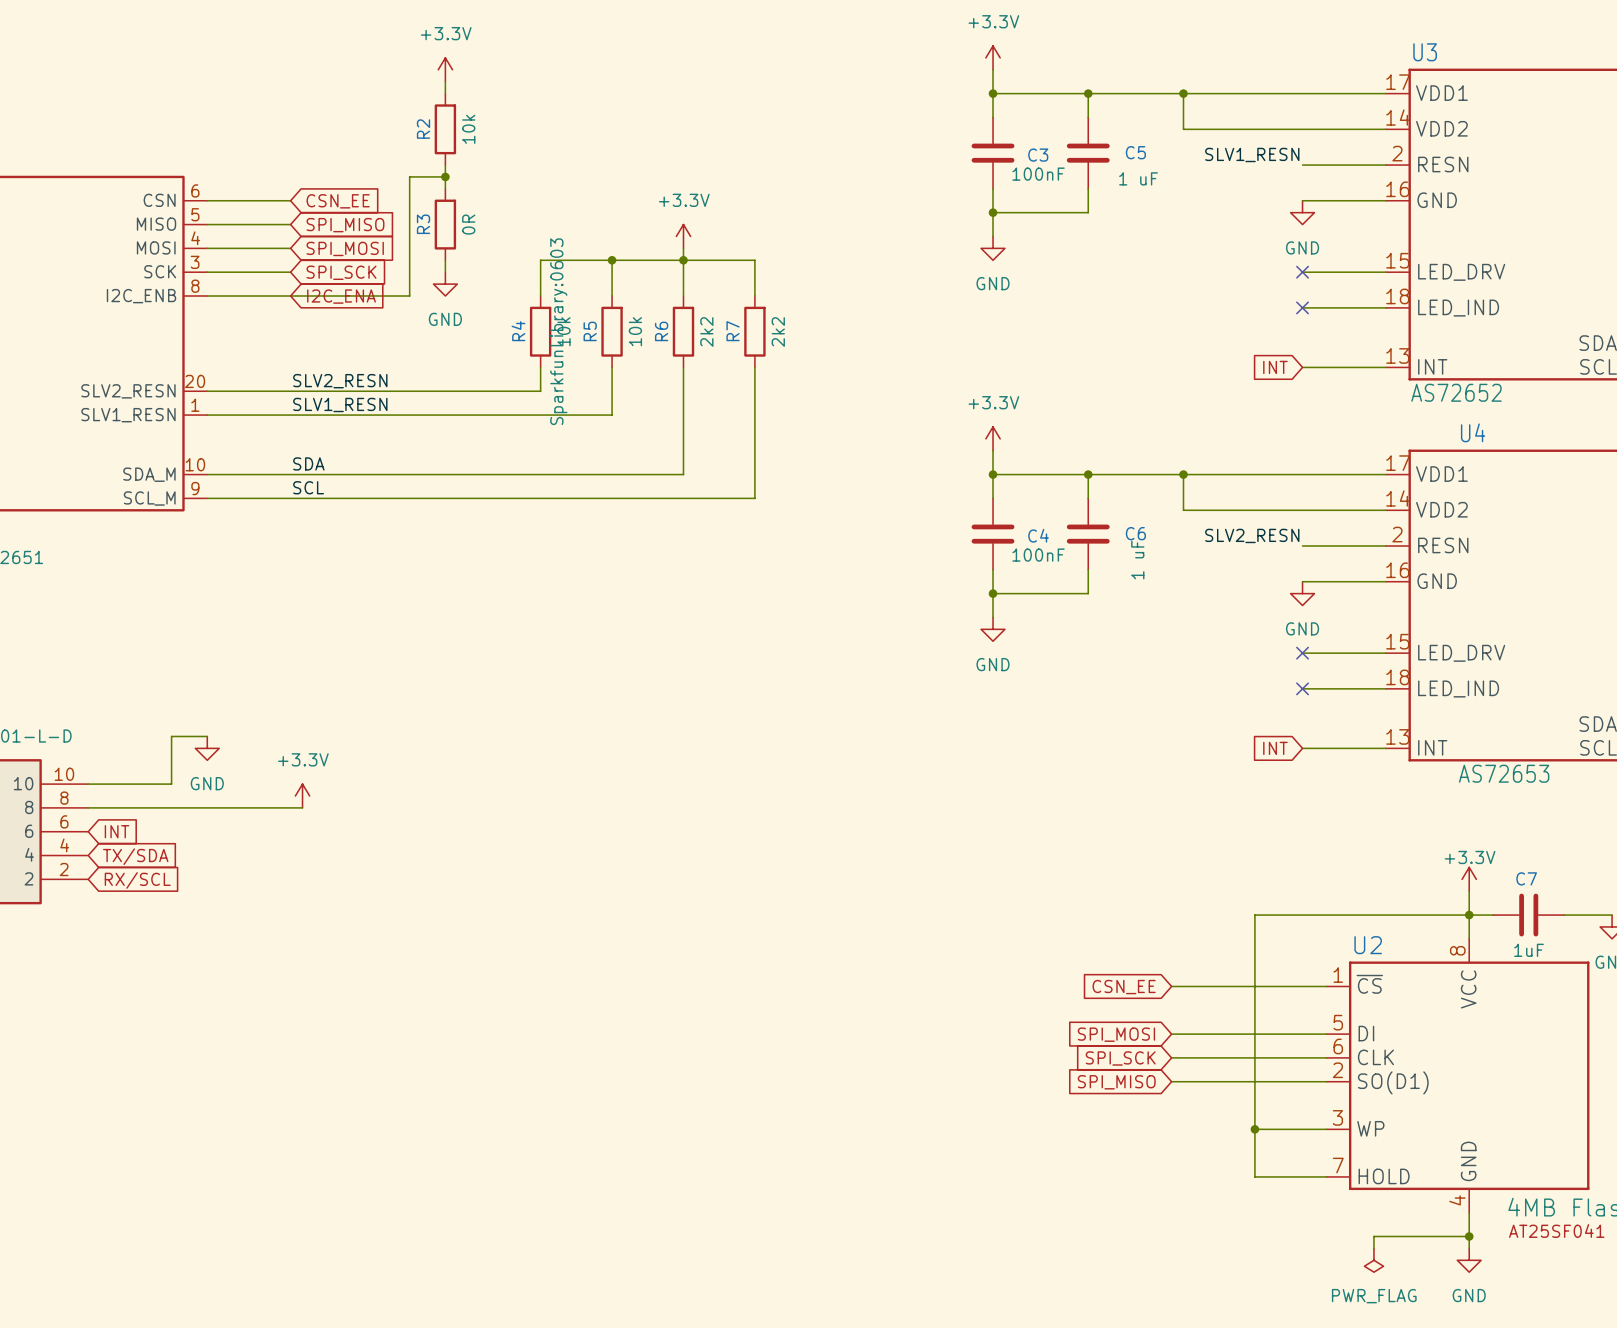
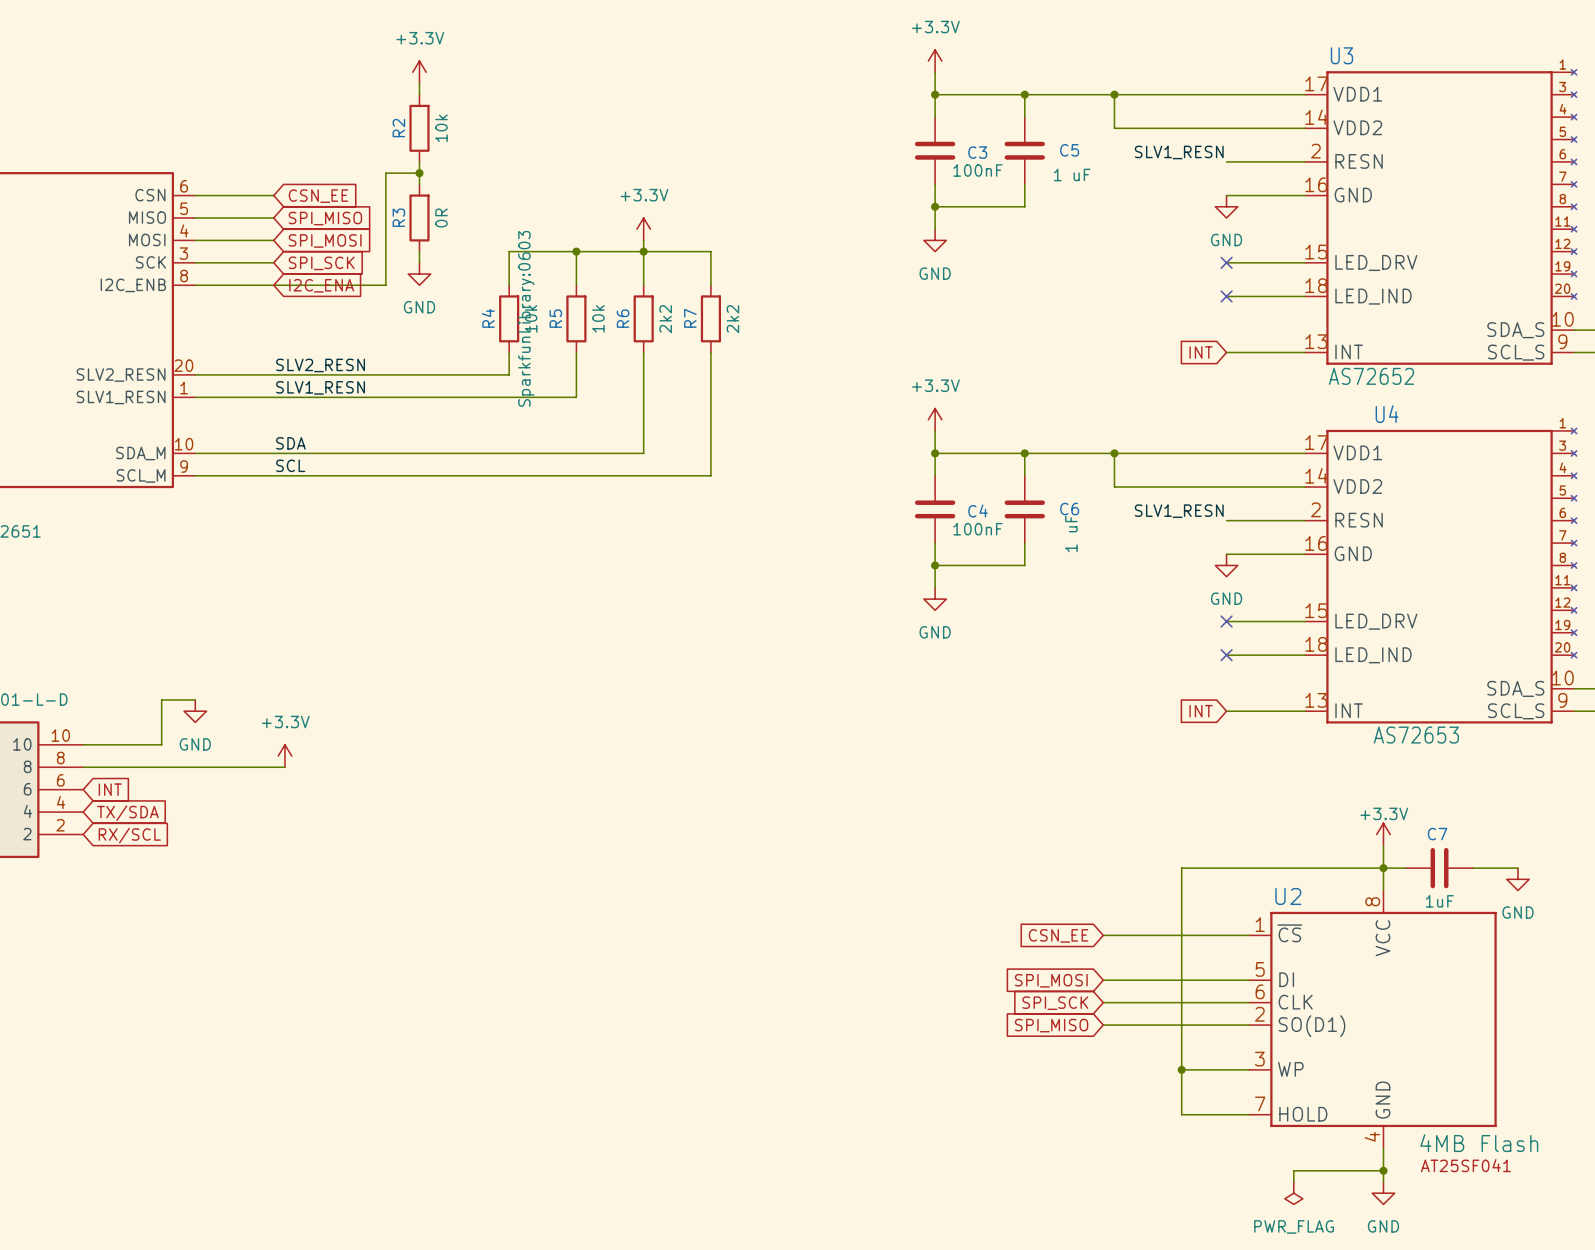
label: SLV2_RESN (1252, 535) -> SLV1_RESN (1179, 511)

